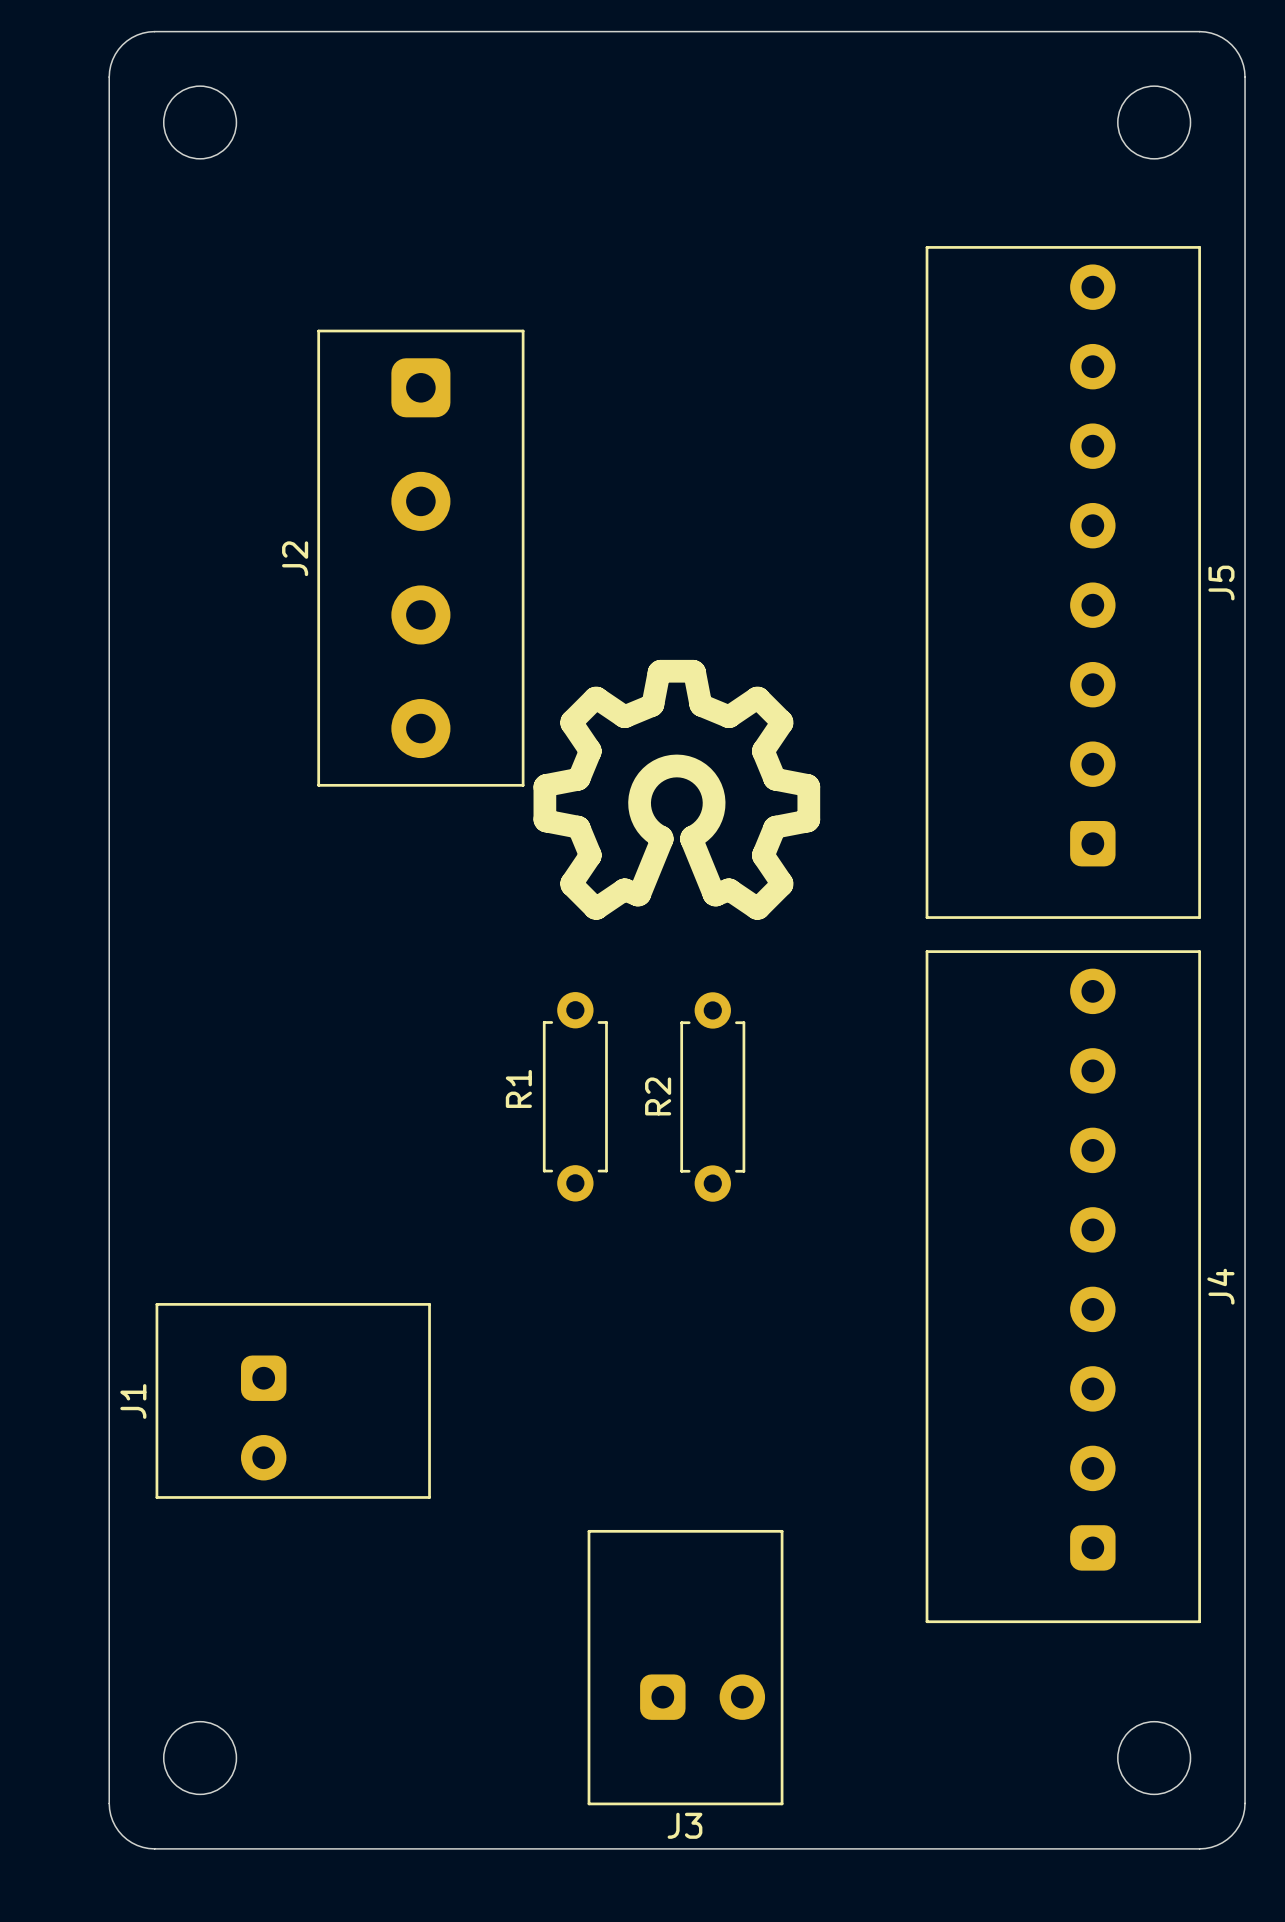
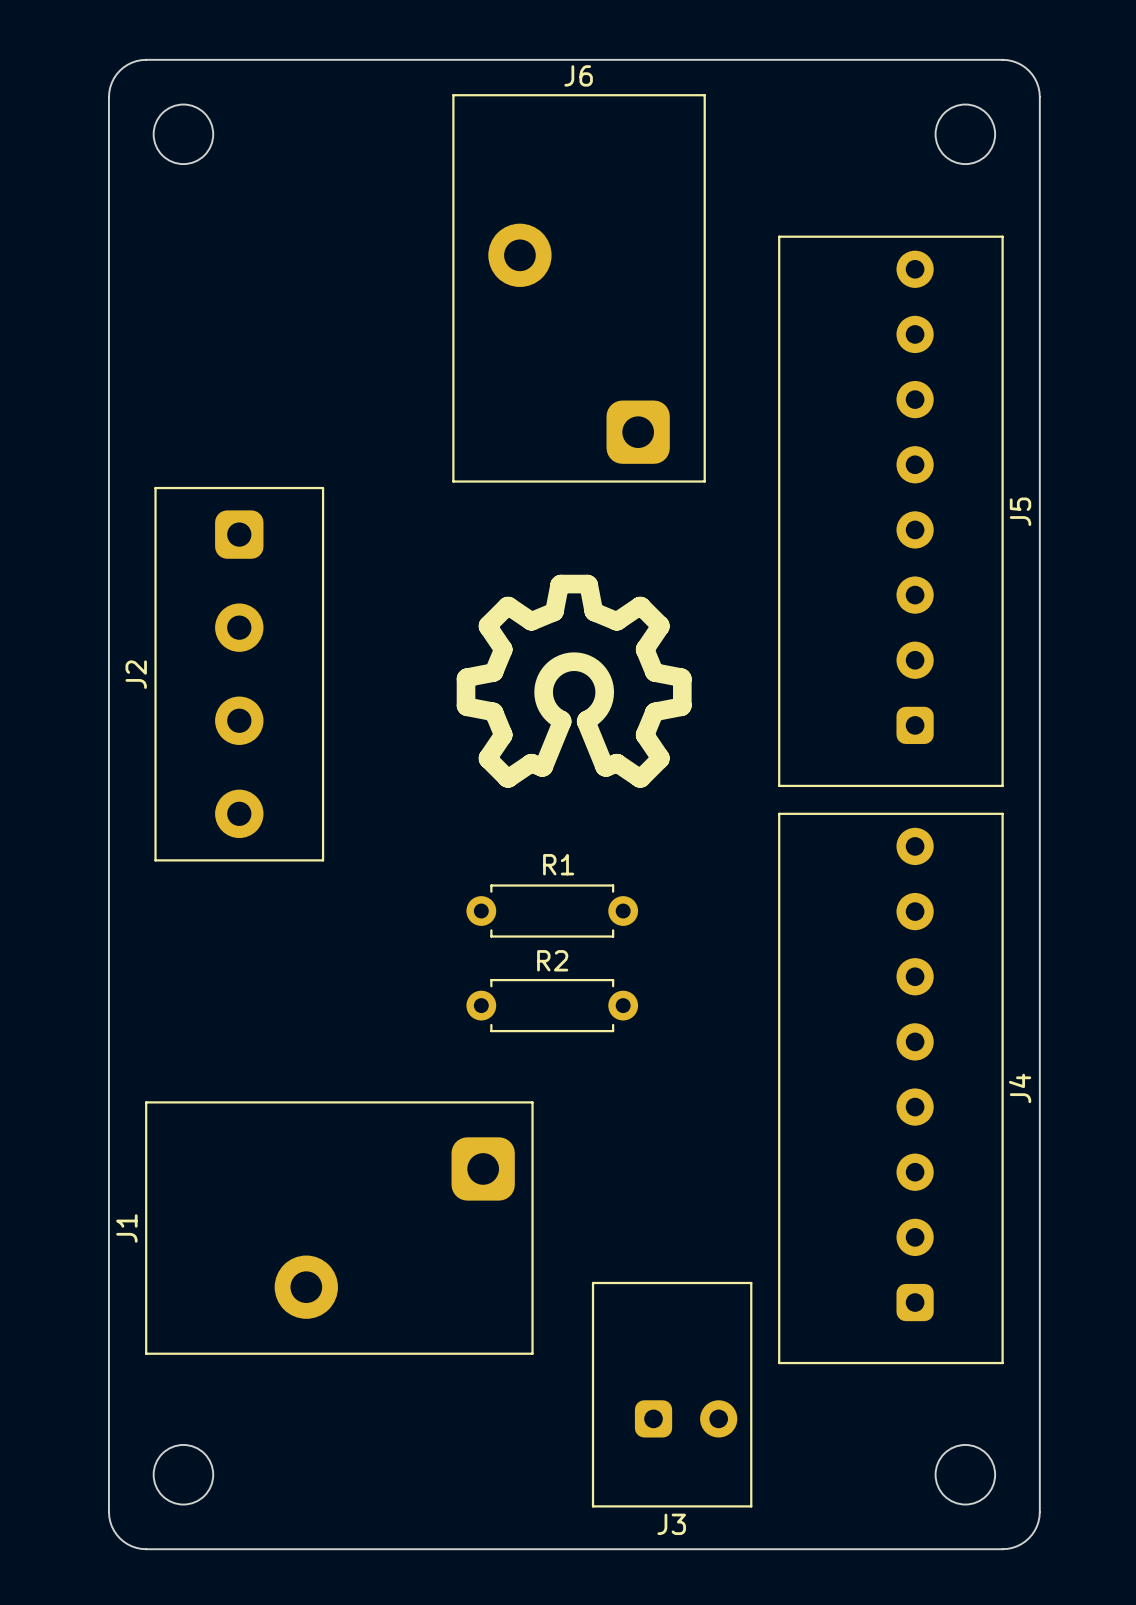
J6: none -> (579, 288)
J2 position: (420, 558) -> (239, 674)
R1 rotation: 0° (575, 1096) -> 90° clockwise (552, 911)
R2 rotation: 0° (712, 1097) -> 90° clockwise (552, 1005)
J1 footprint: [155, 1303, 431, 1499] -> [145, 1101, 534, 1355]
J1 name position: J1 (133, 1401) -> J1 (126, 1228)
J3 position: (685, 1667) -> (672, 1394)

